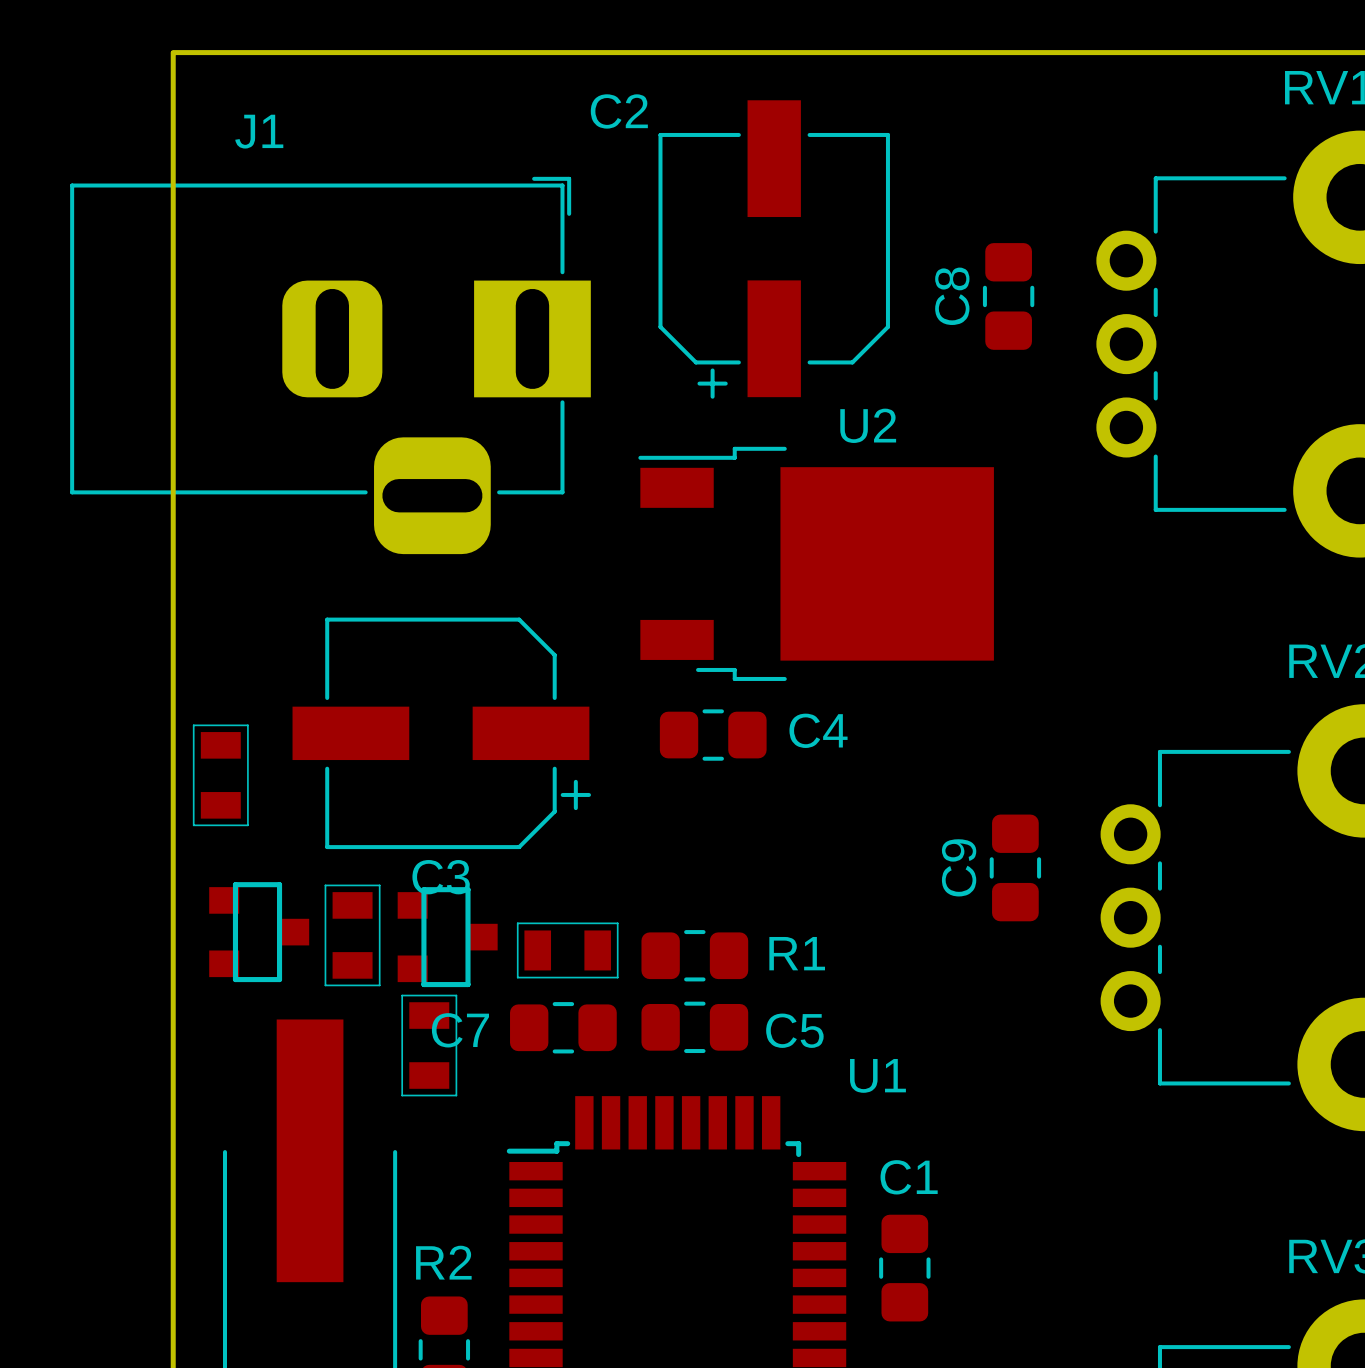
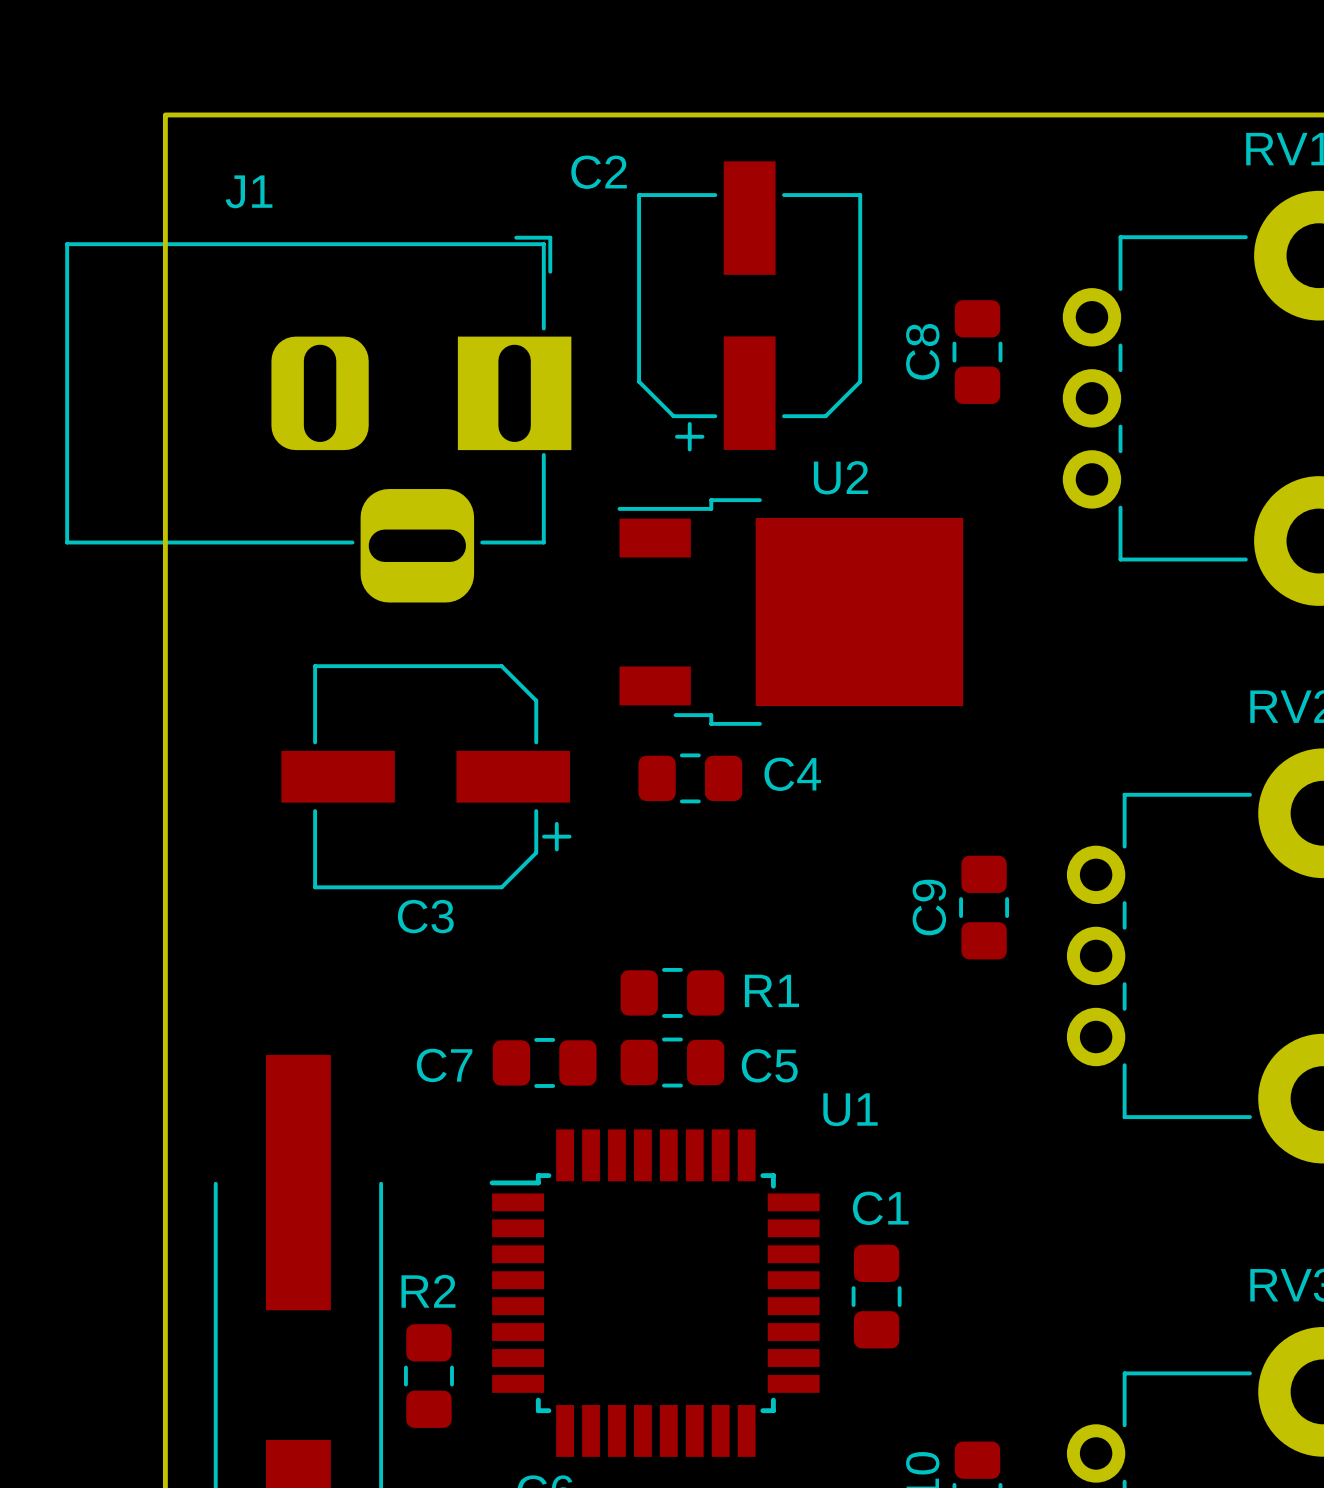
part: (220, 775) -> none
part: (259, 932) -> none
part: (352, 935) -> none
part: (447, 937) -> none
part: (567, 950) -> none
part: (429, 1045) -> none

